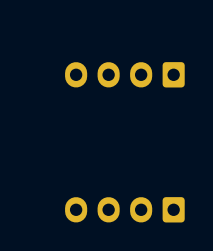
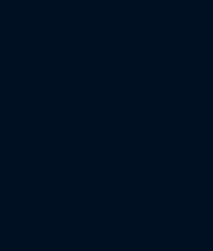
part: (124, 74) -> none
part: (124, 209) -> none

